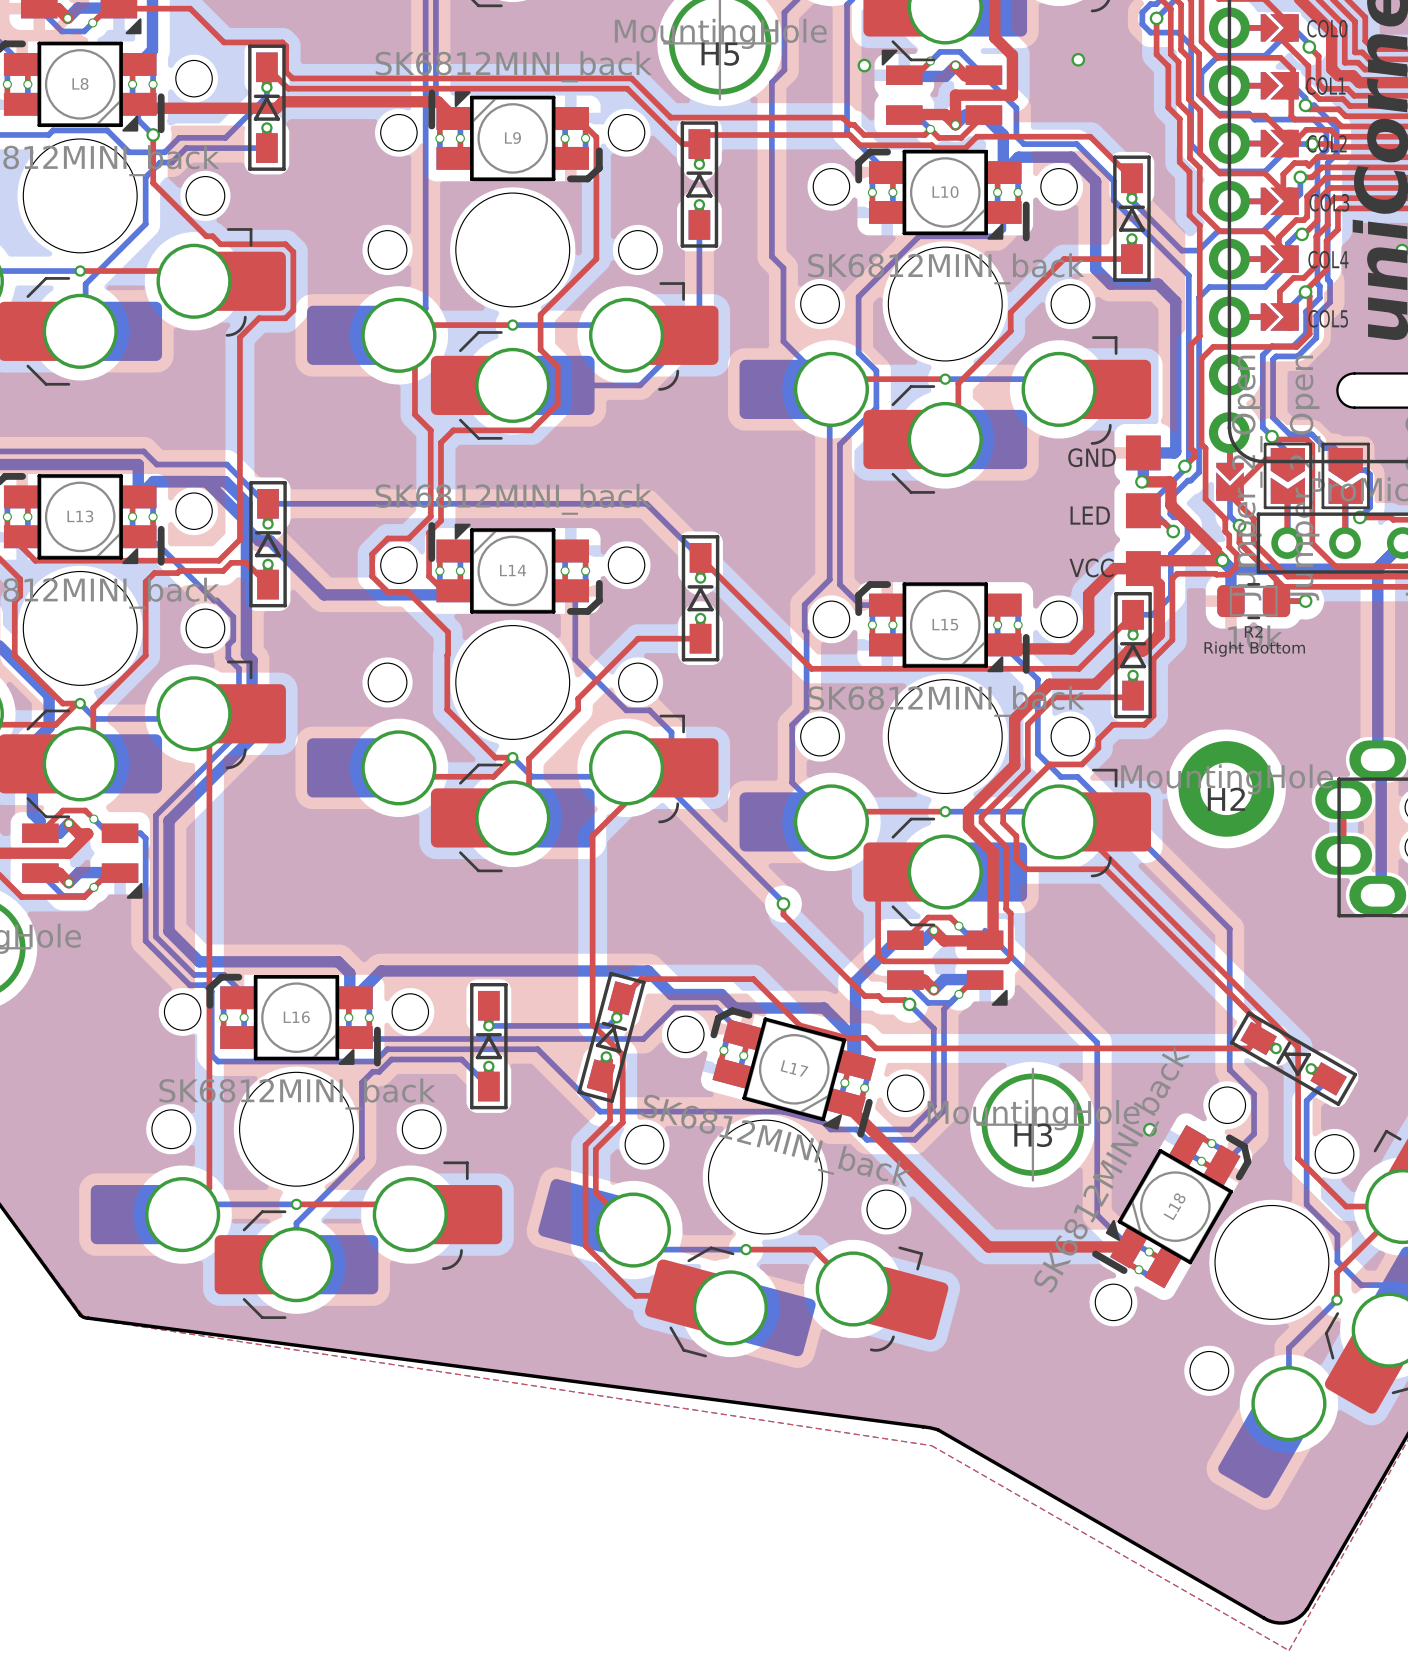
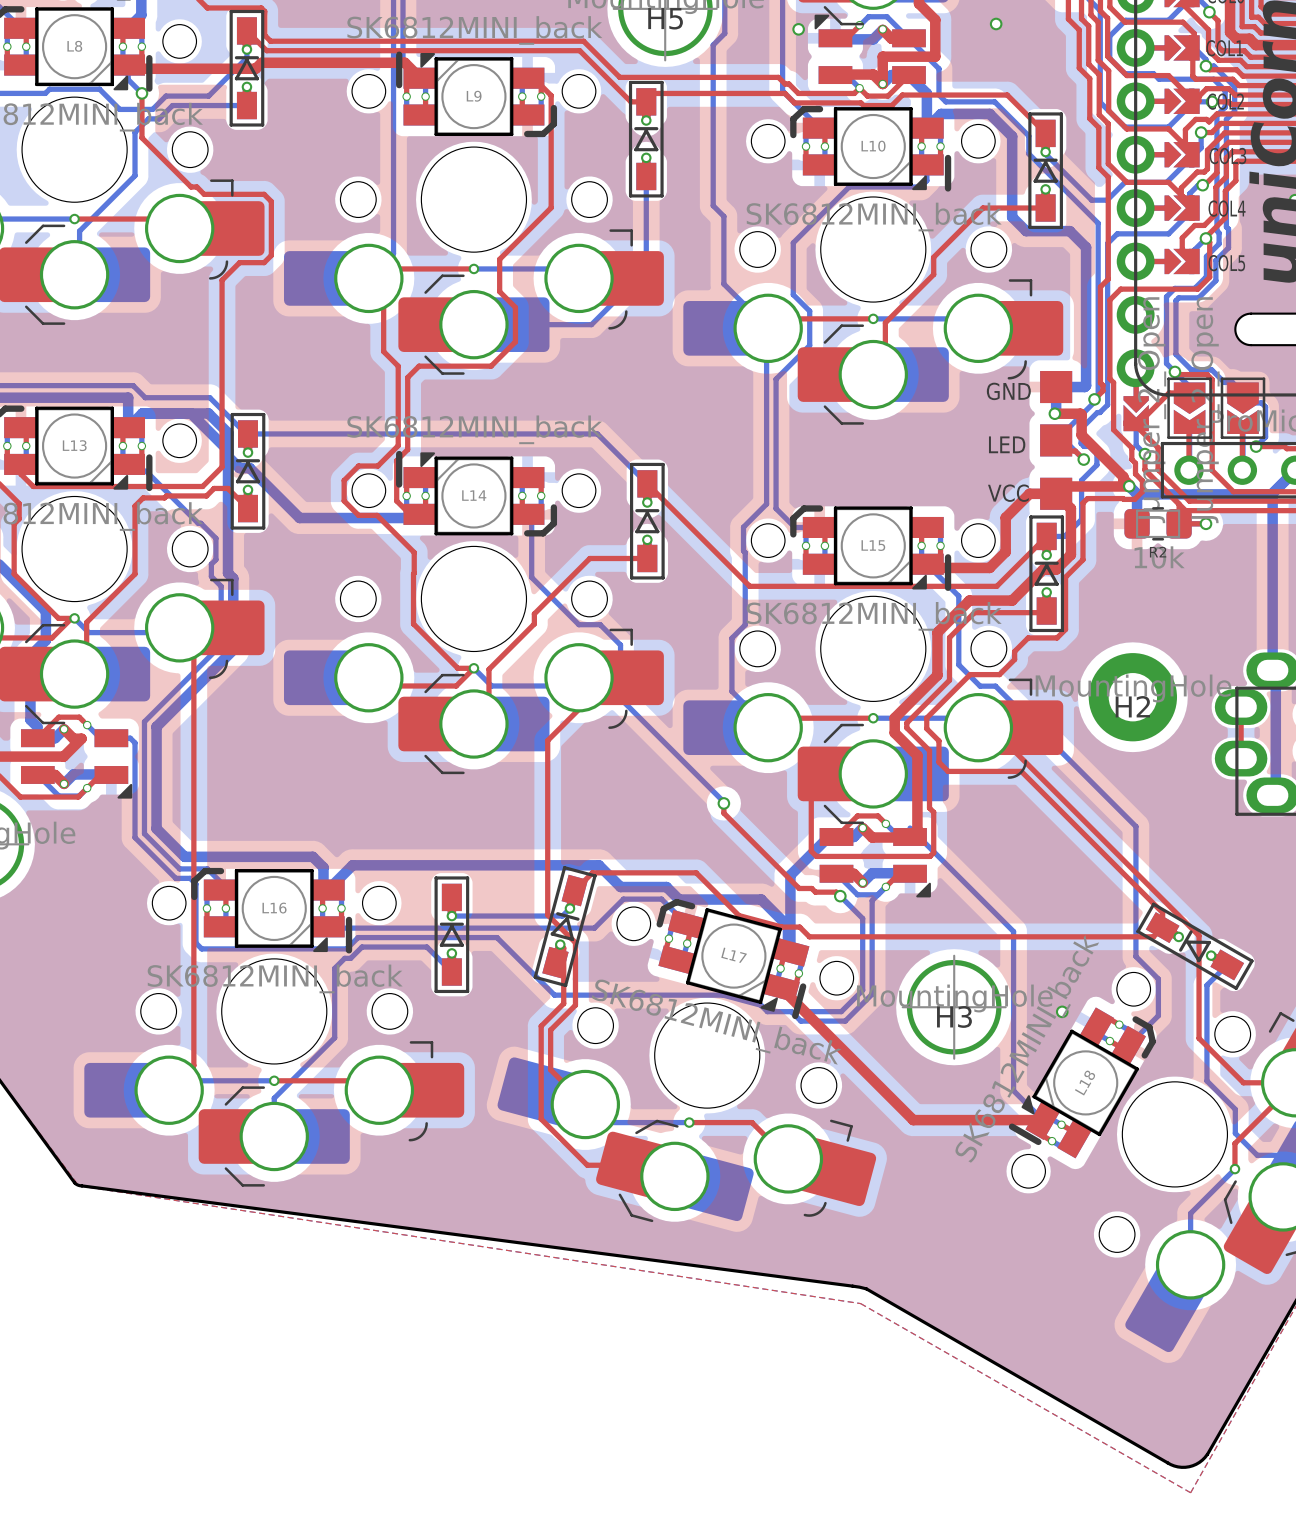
text: Right Bottom (1254, 649) -> none

